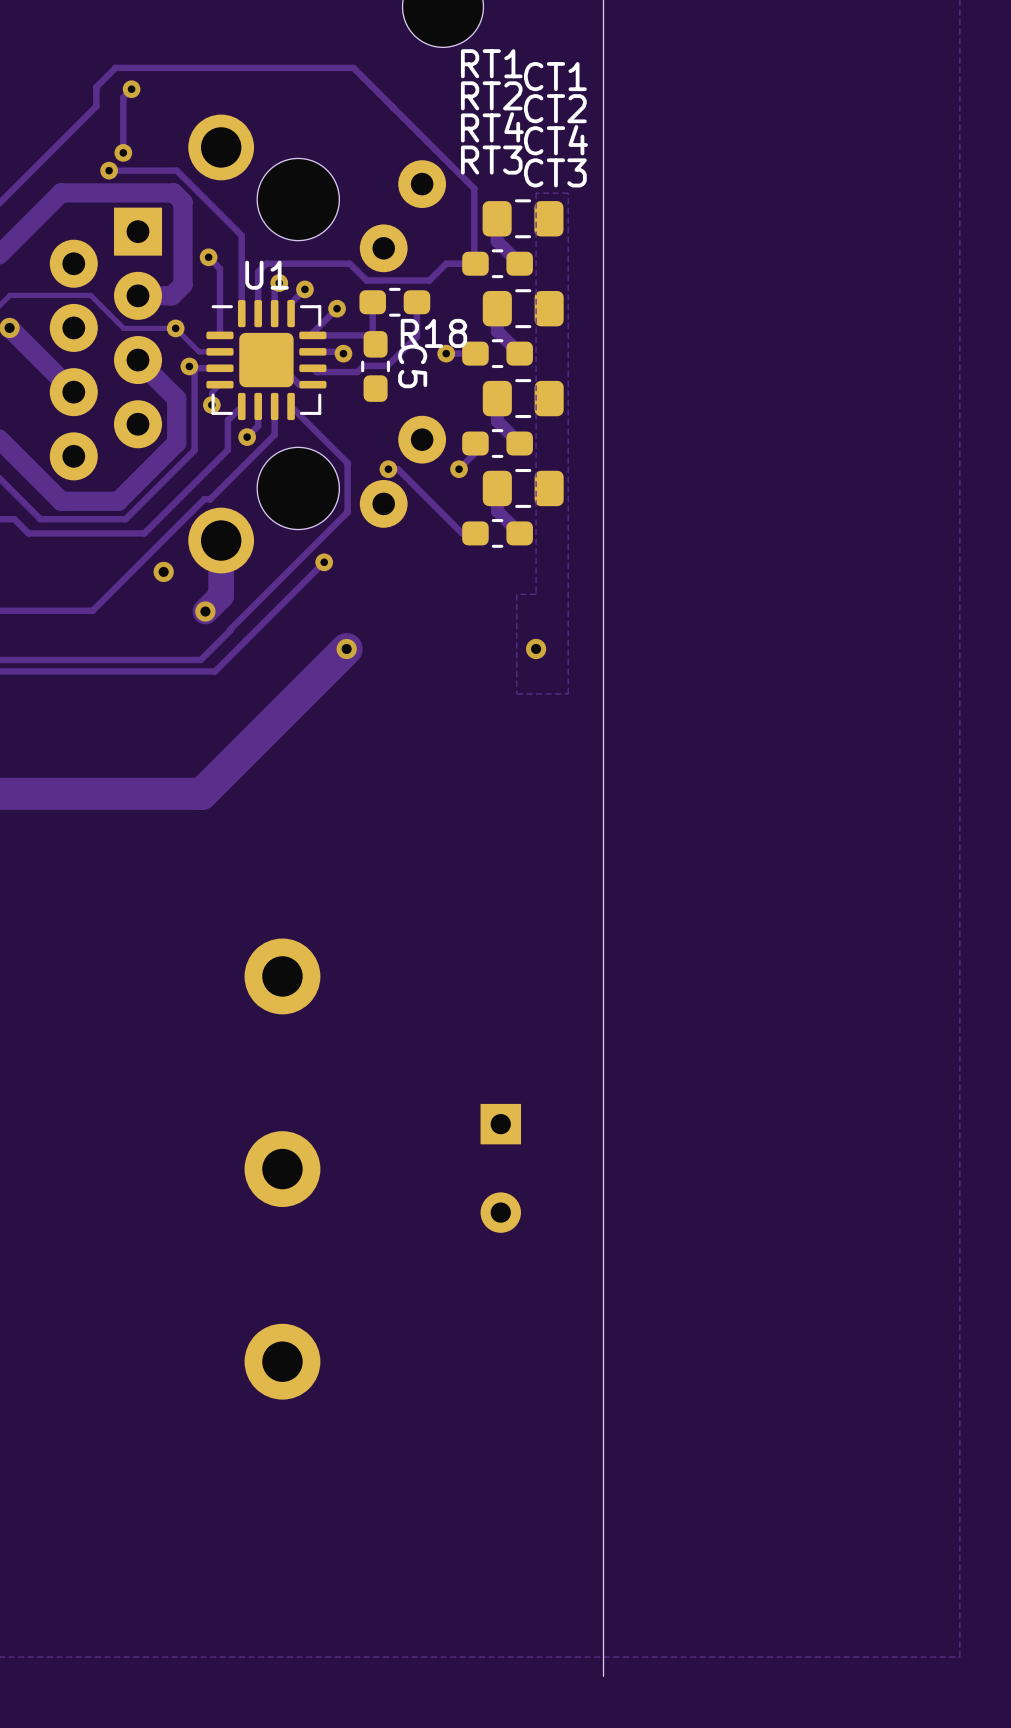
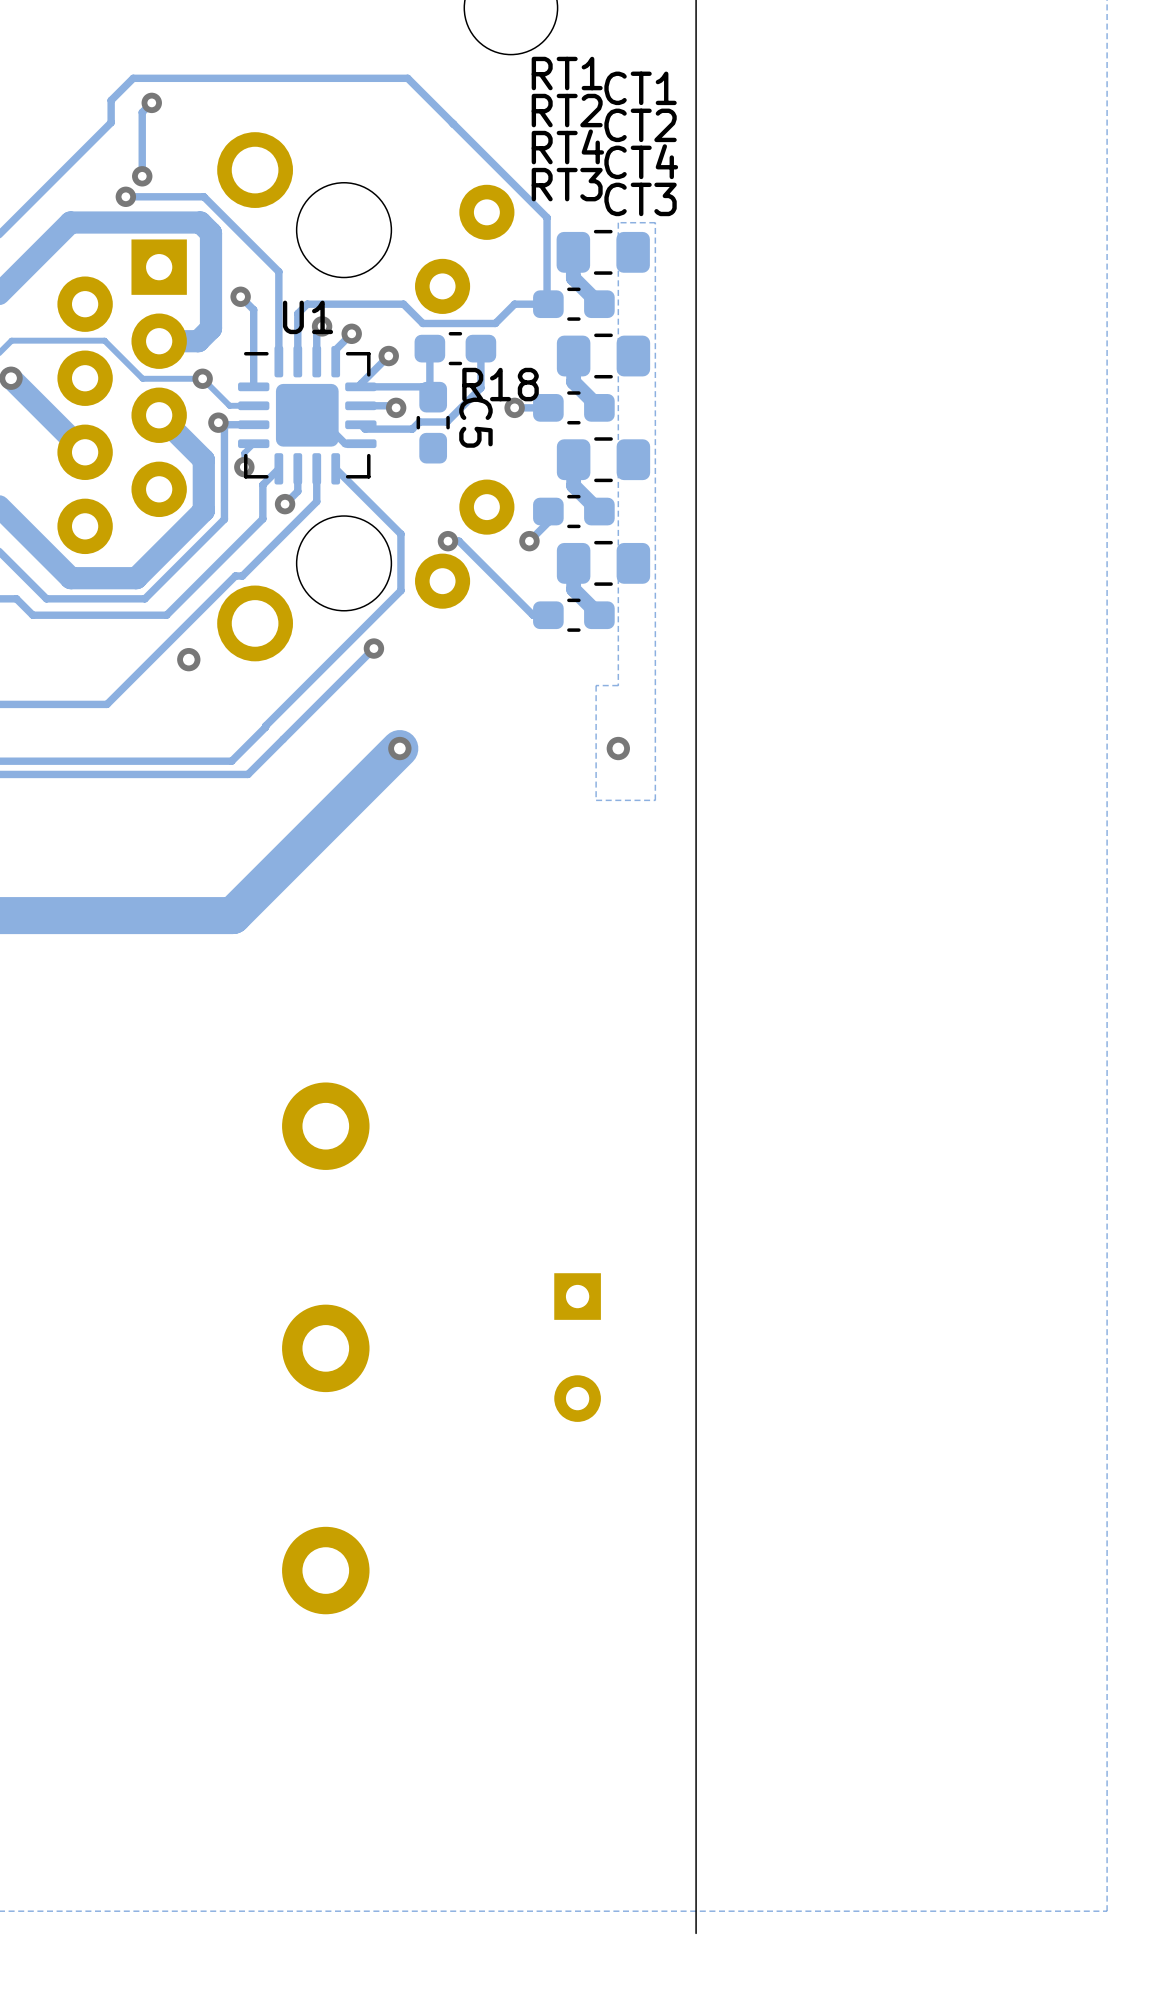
track: (221, 540) (221, 595) (205, 611) -> none
via: (205, 611) -> none

